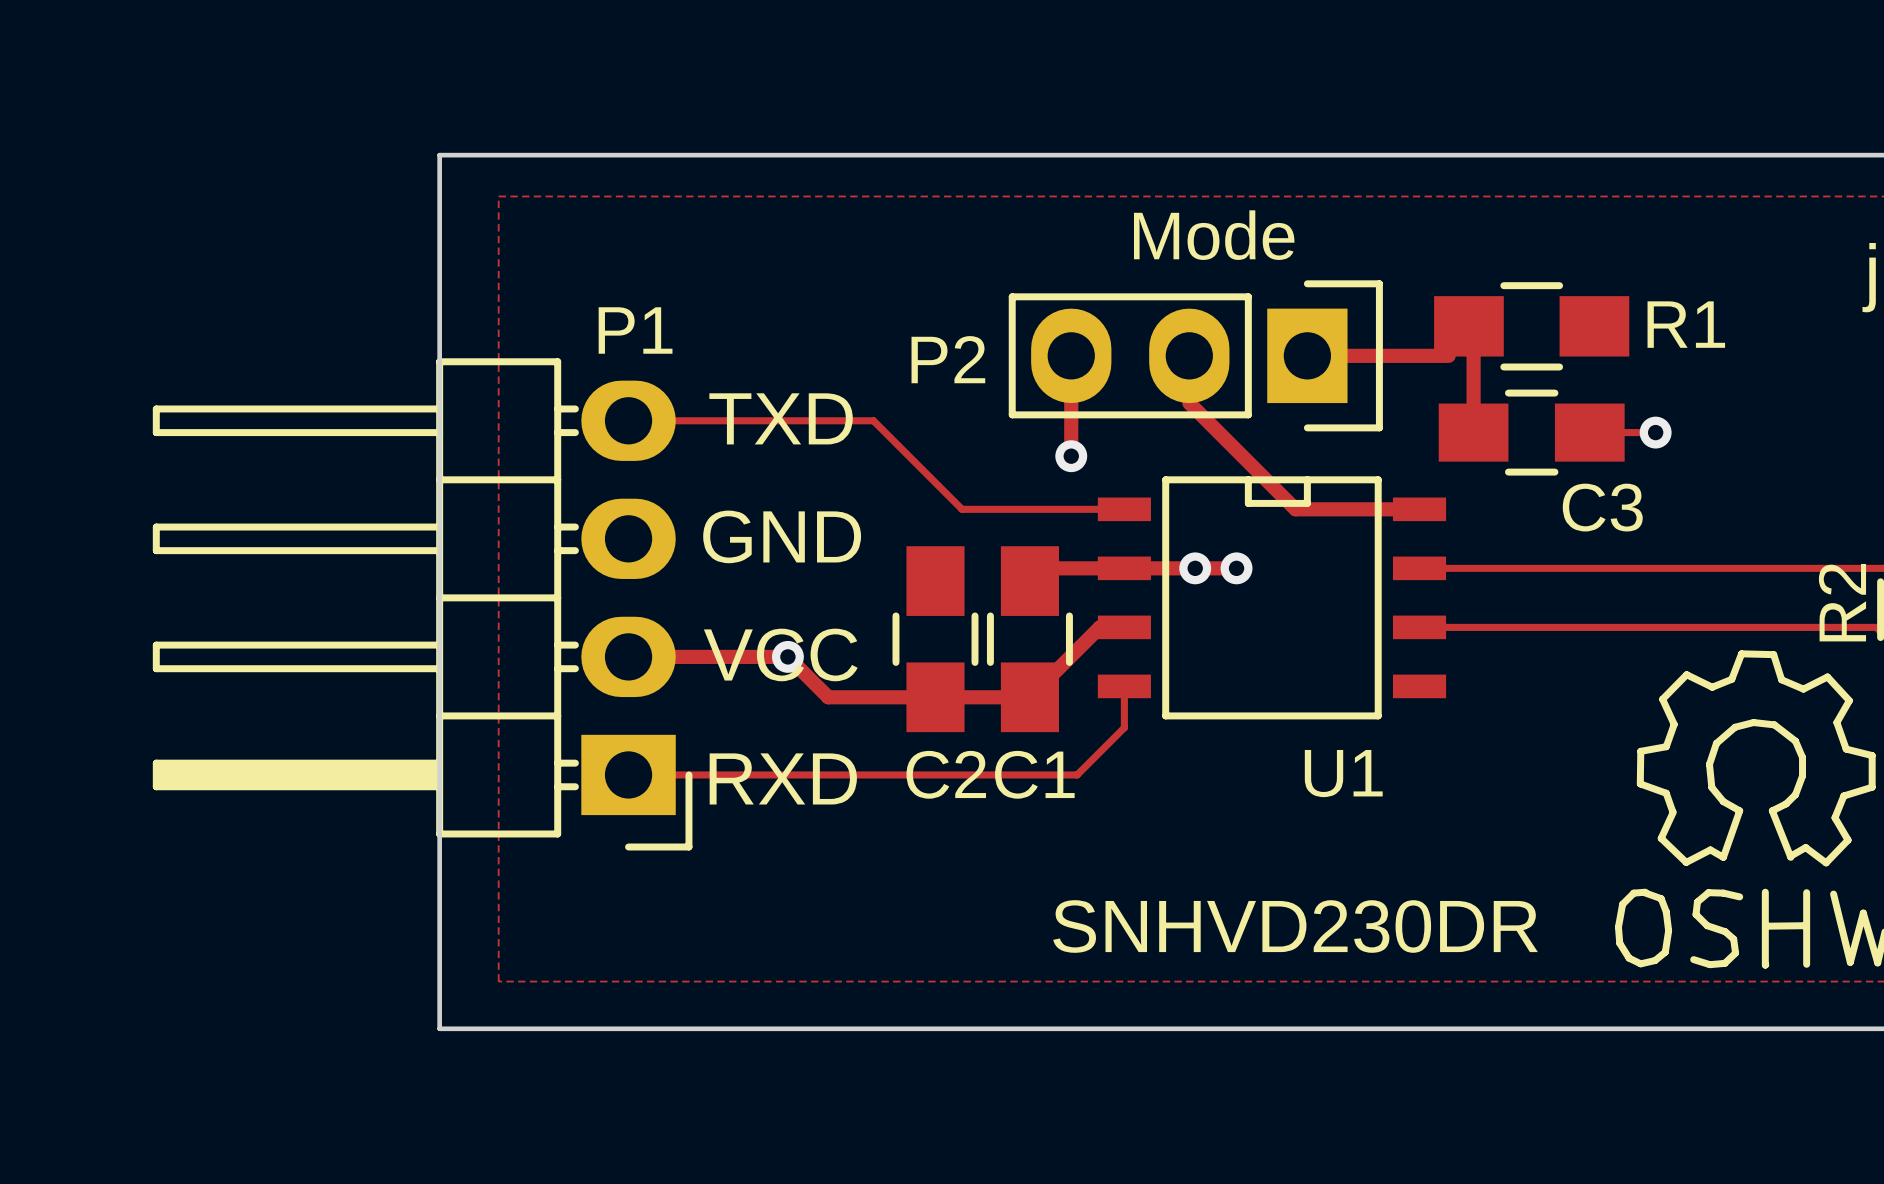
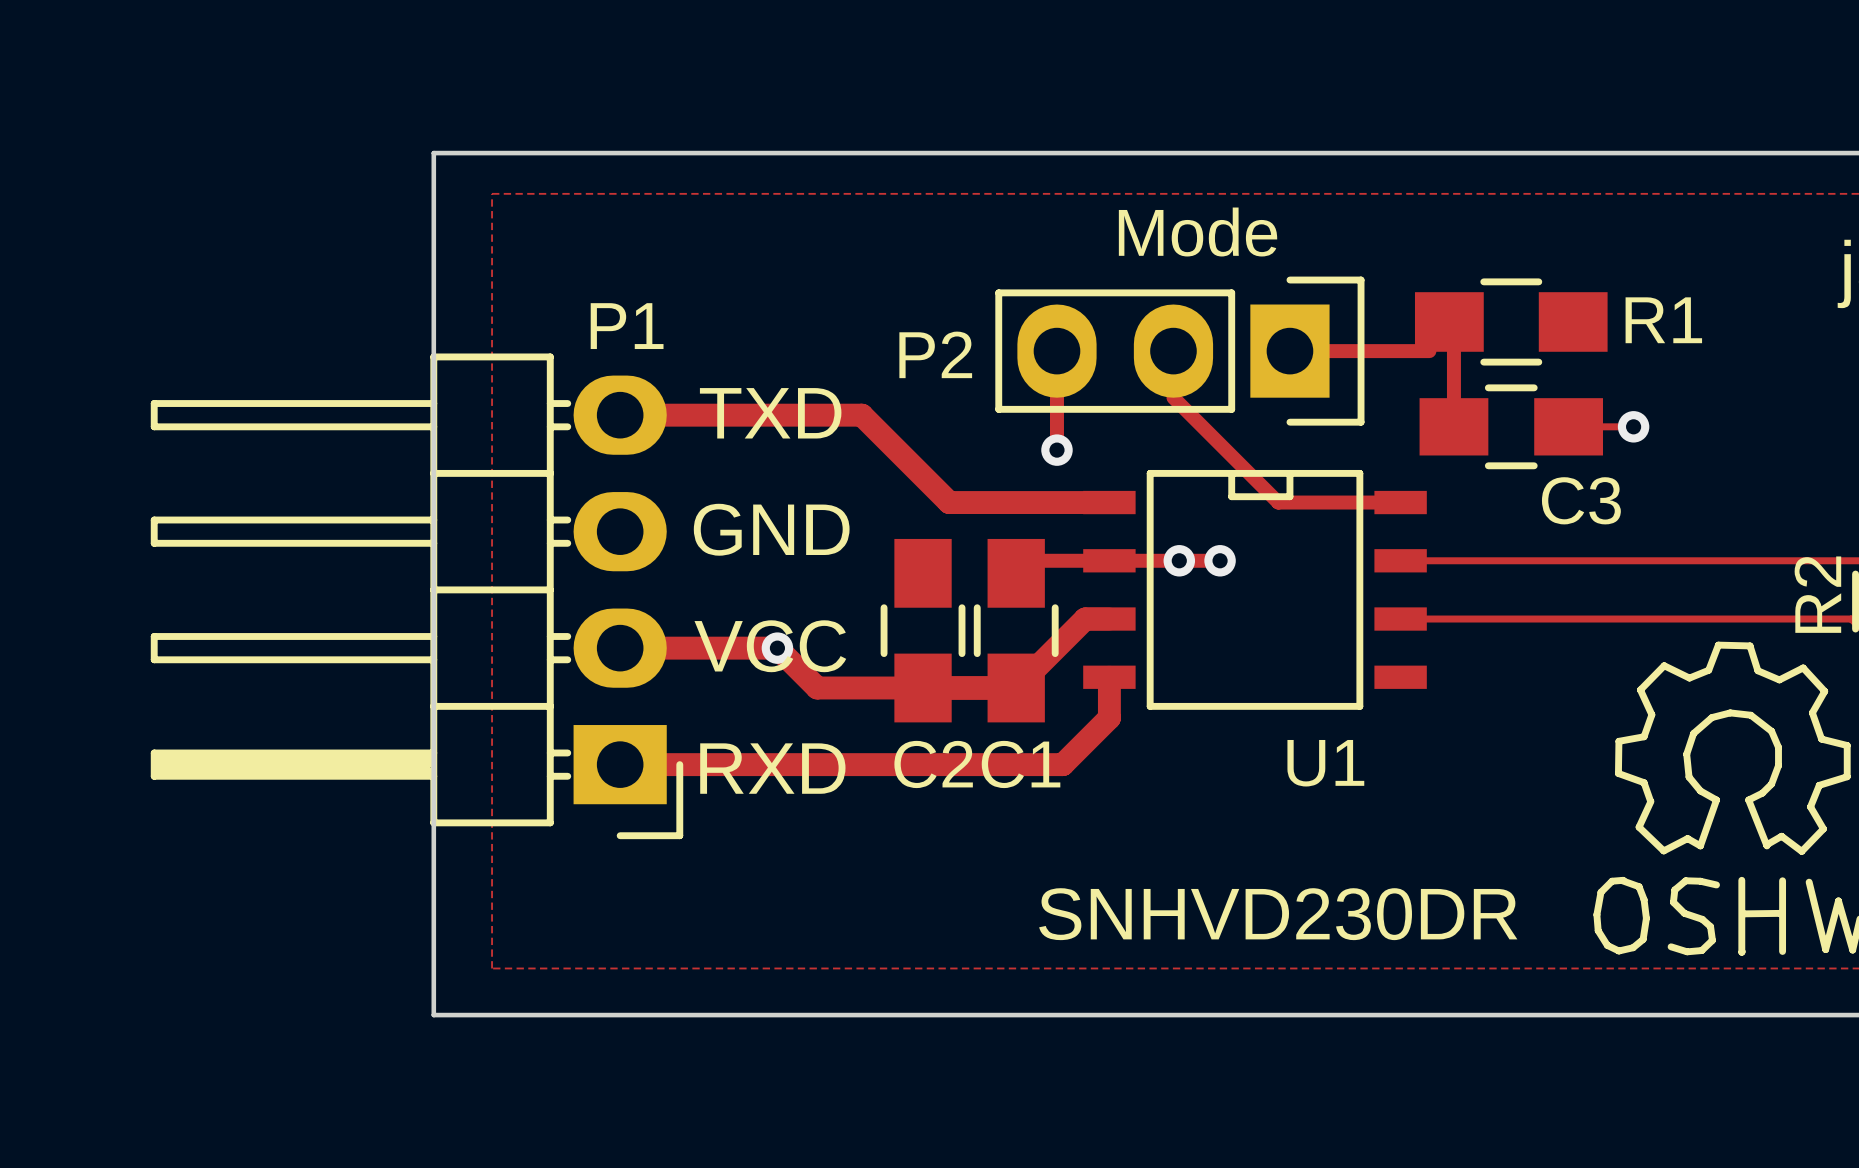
track width: thin (628, 420) (873, 420) (962, 509) (1124, 509) -> thick (620, 415) (861, 415) (949, 502) (1109, 502)
track width: thin (1124, 627) (1099, 627) (1029, 697) (828, 697) (787, 656) (628, 656) -> thick (1109, 619) (1085, 619) (1016, 687) (817, 687) (777, 648) (620, 648)
track width: thin (1124, 686) (1124, 727) (1077, 774) (628, 774) -> thick (1109, 677) (1109, 718) (1062, 764) (620, 764)

